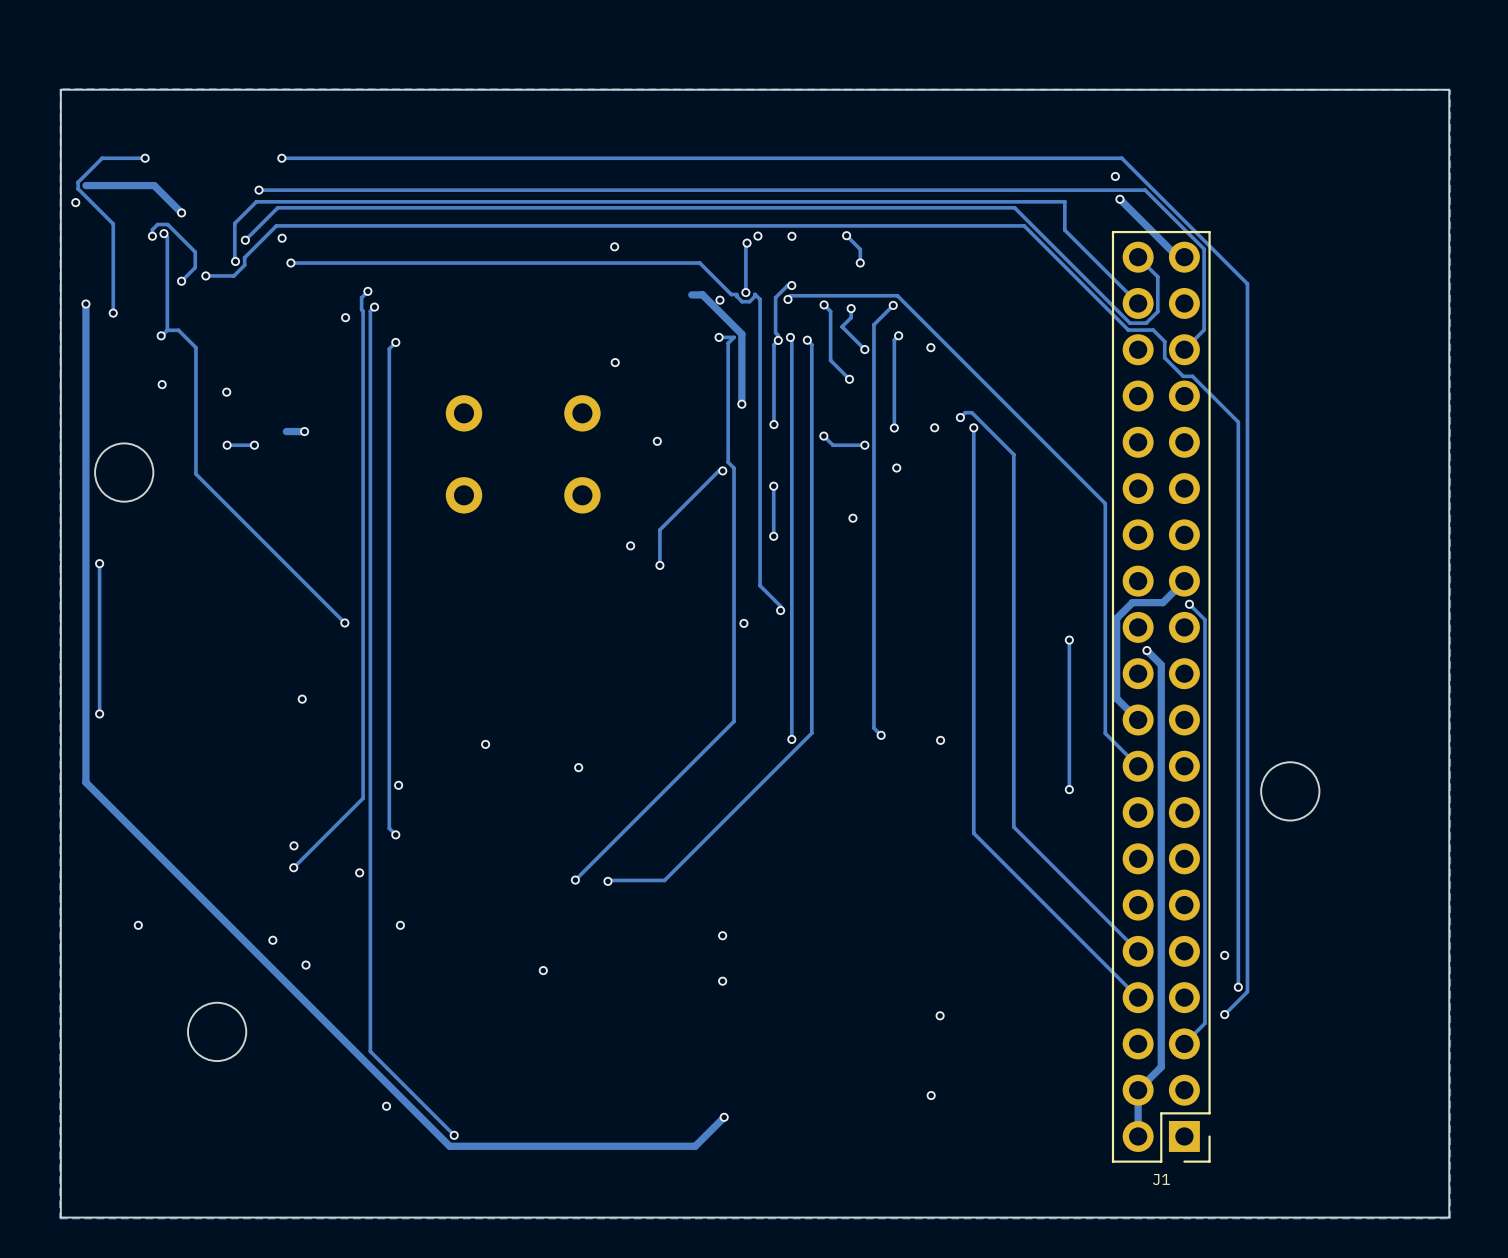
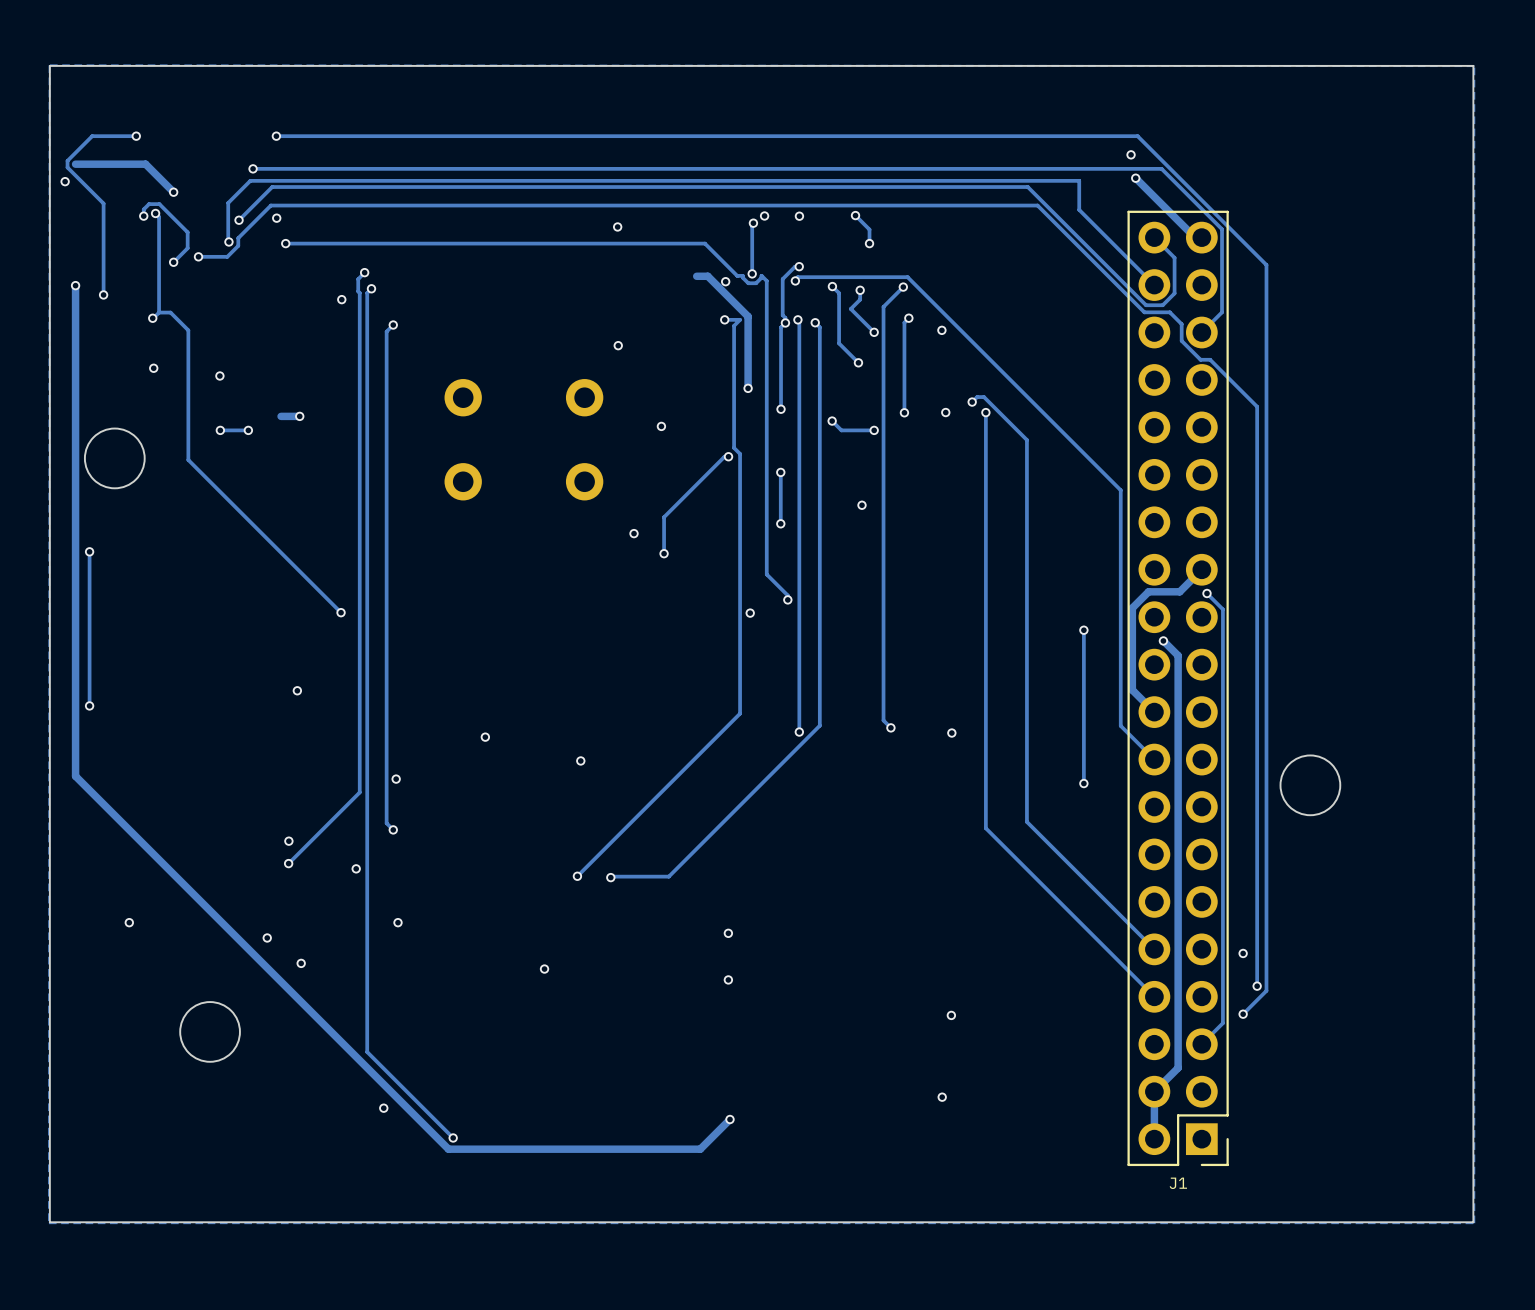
via: (896, 467) -> none

